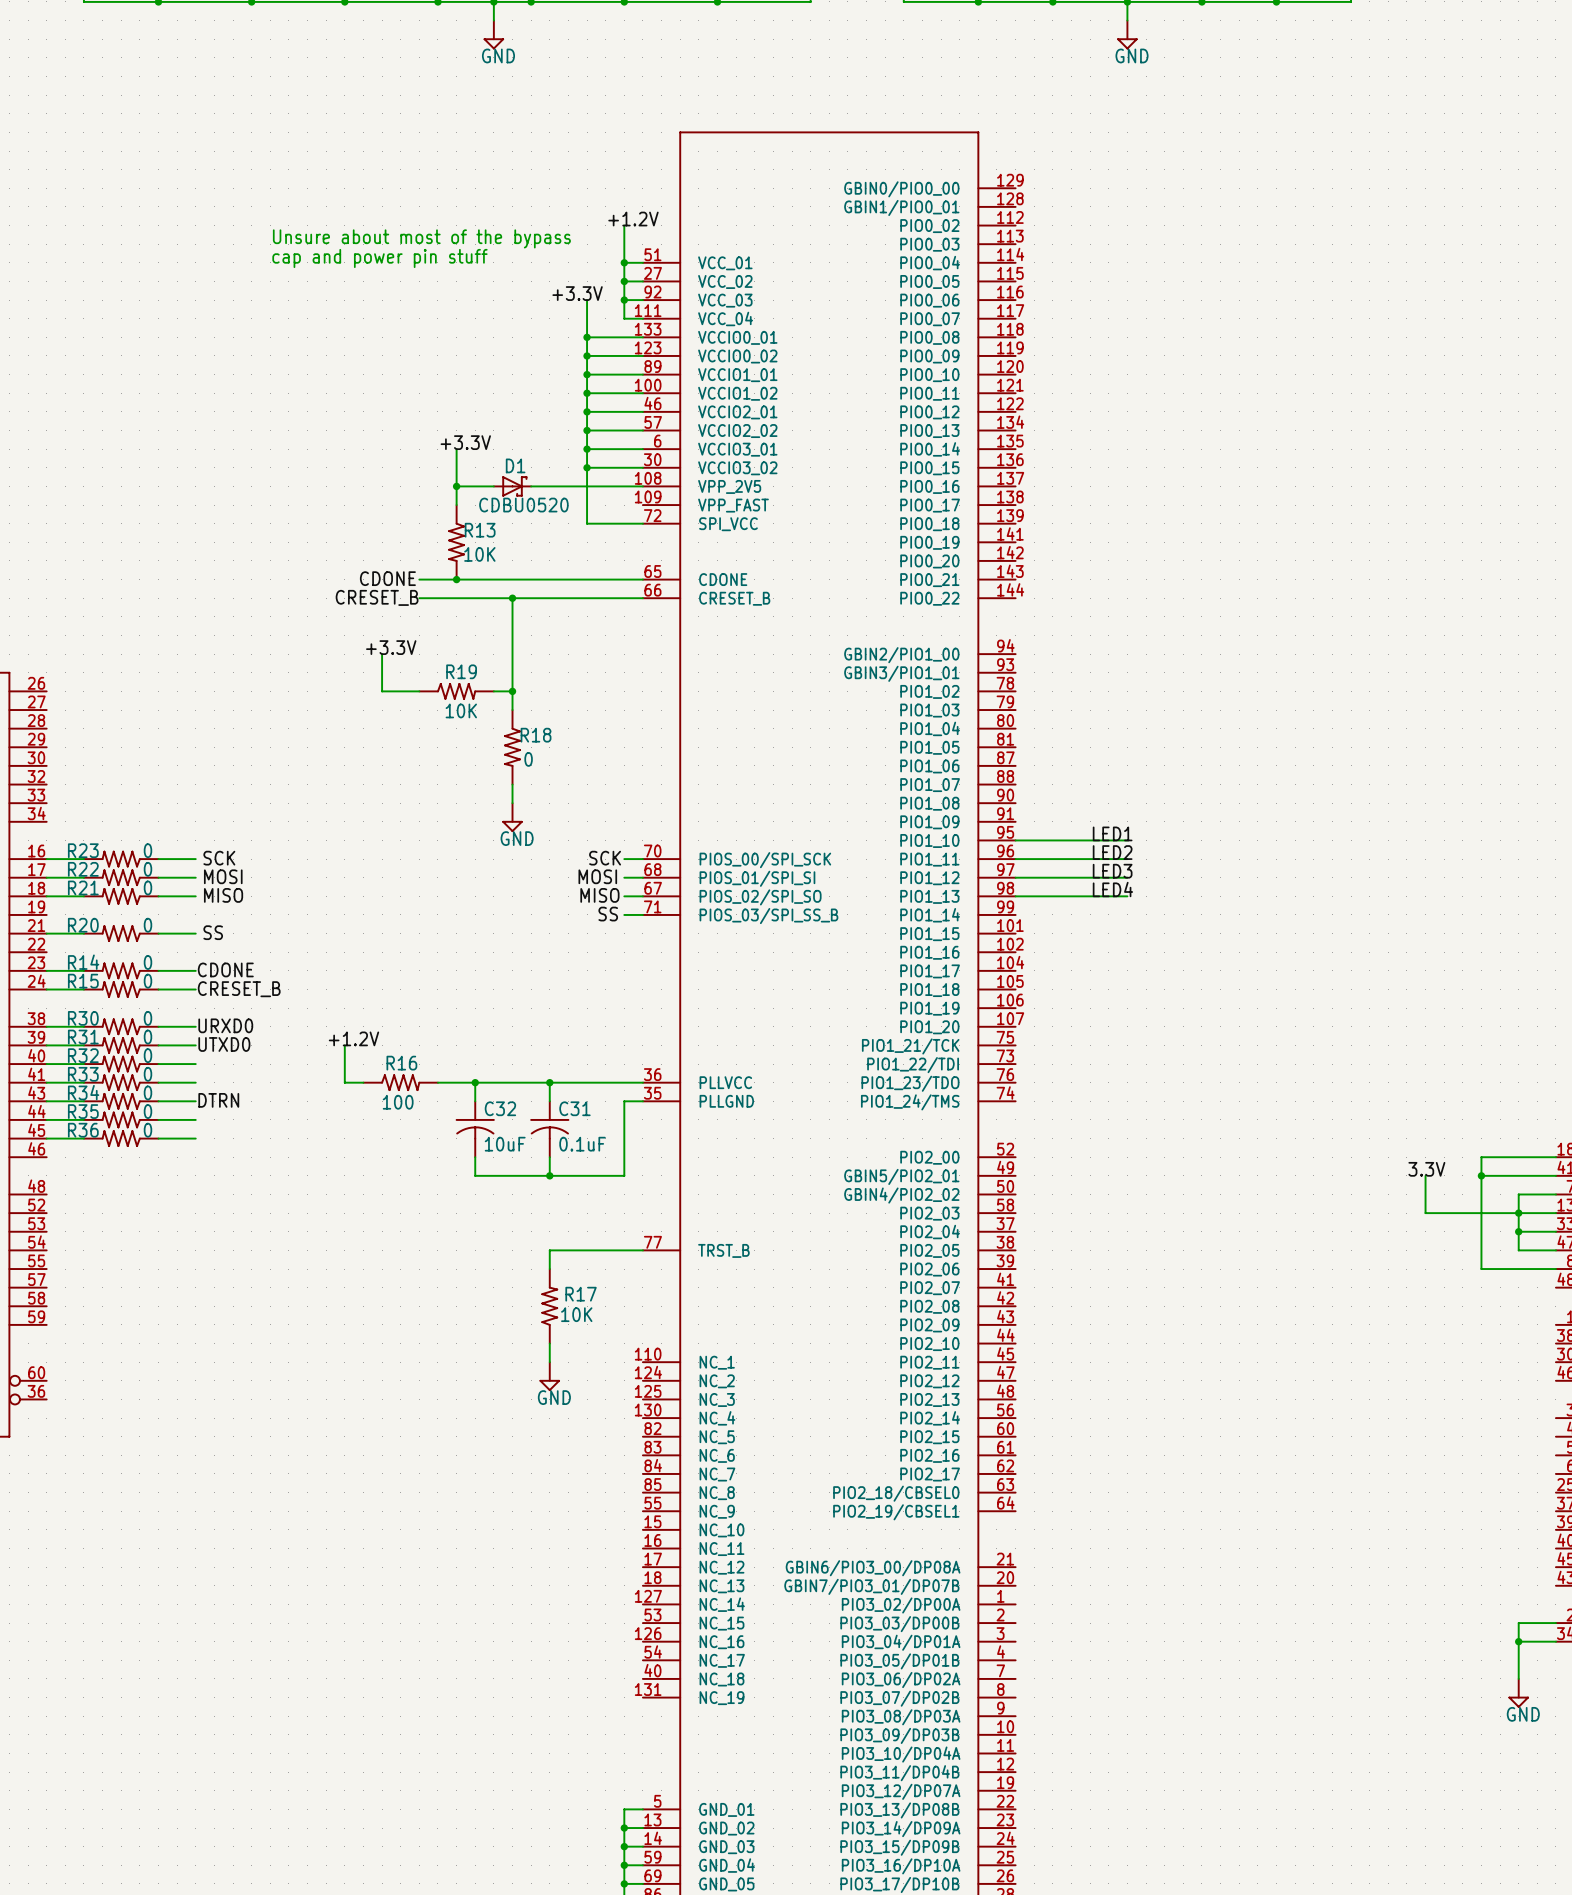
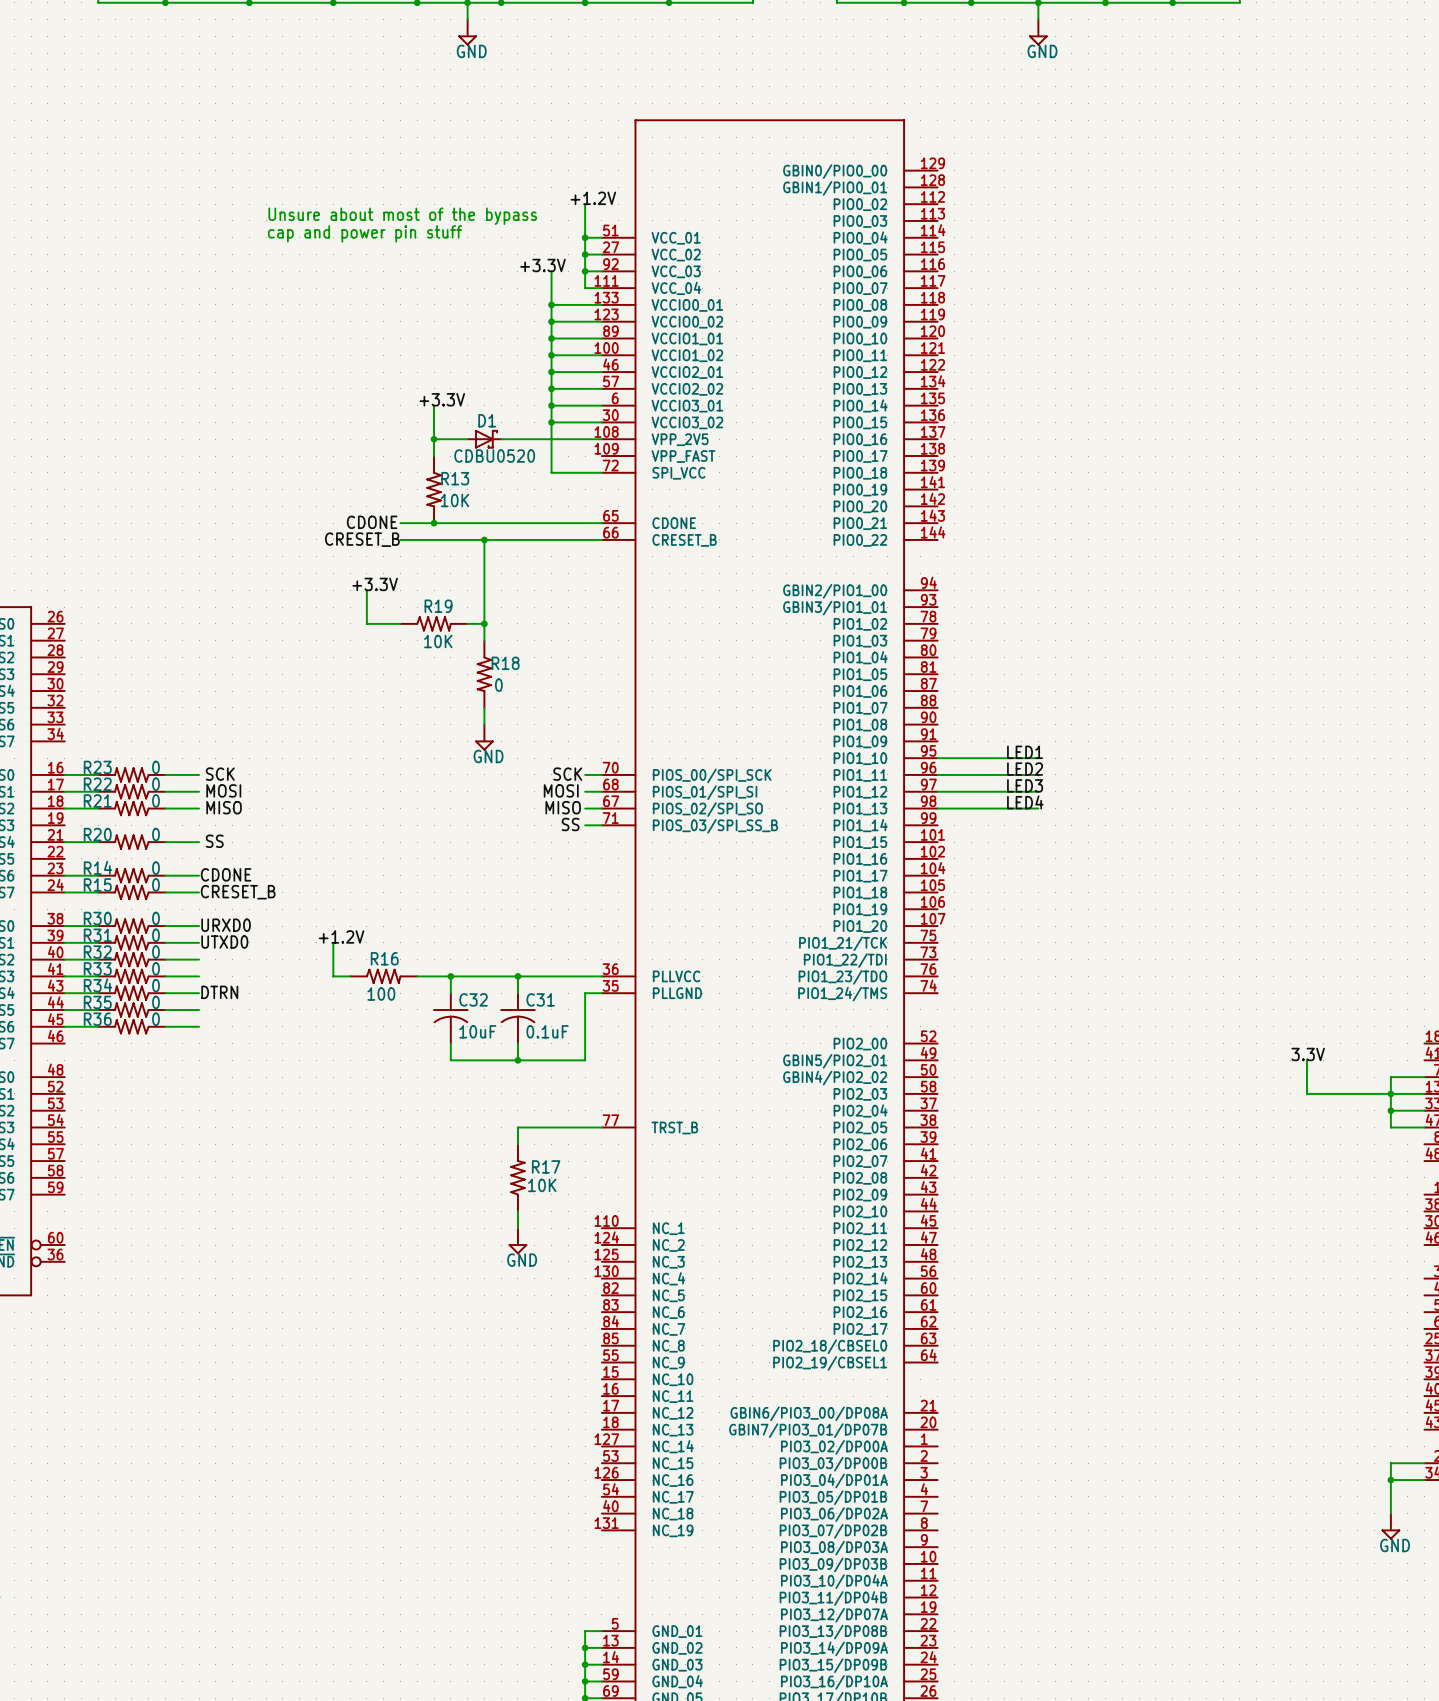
wire: (1555, 1157) (1481, 1157) (1481, 1269) (1555, 1269) -> none
wire: (1481, 1175) (1555, 1175) -> none
junction: (1481, 1175) -> none

